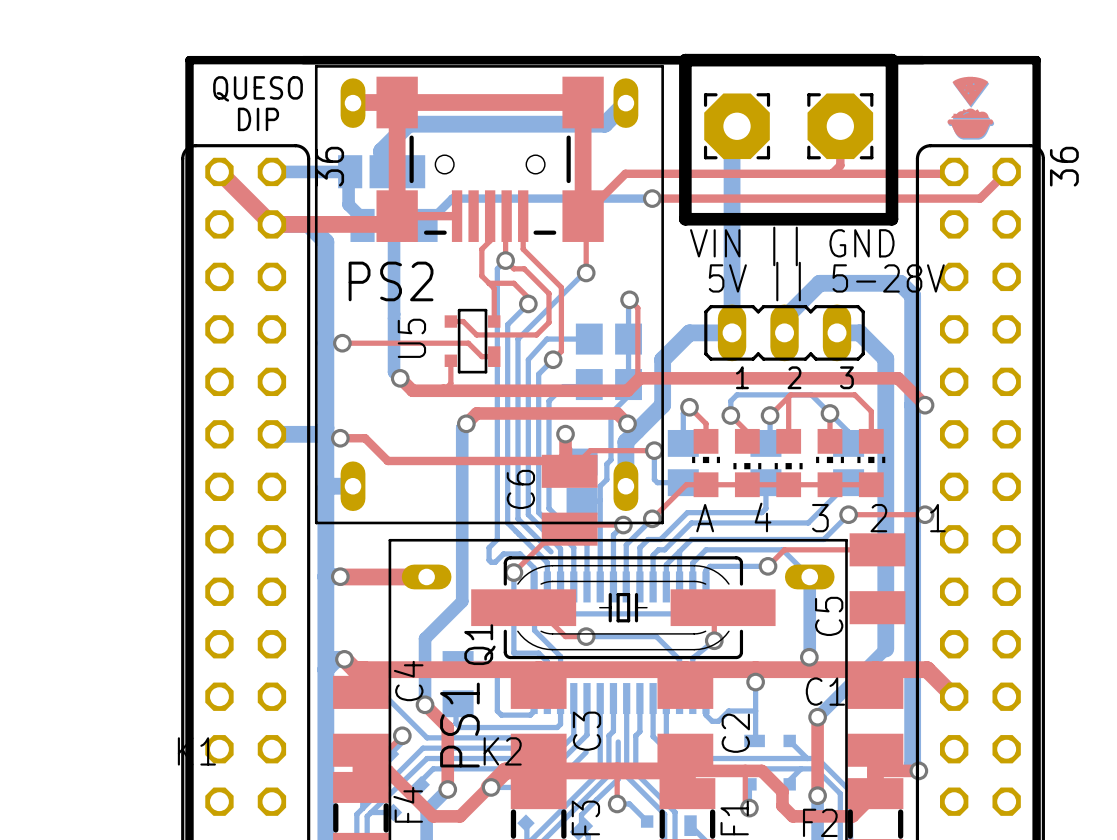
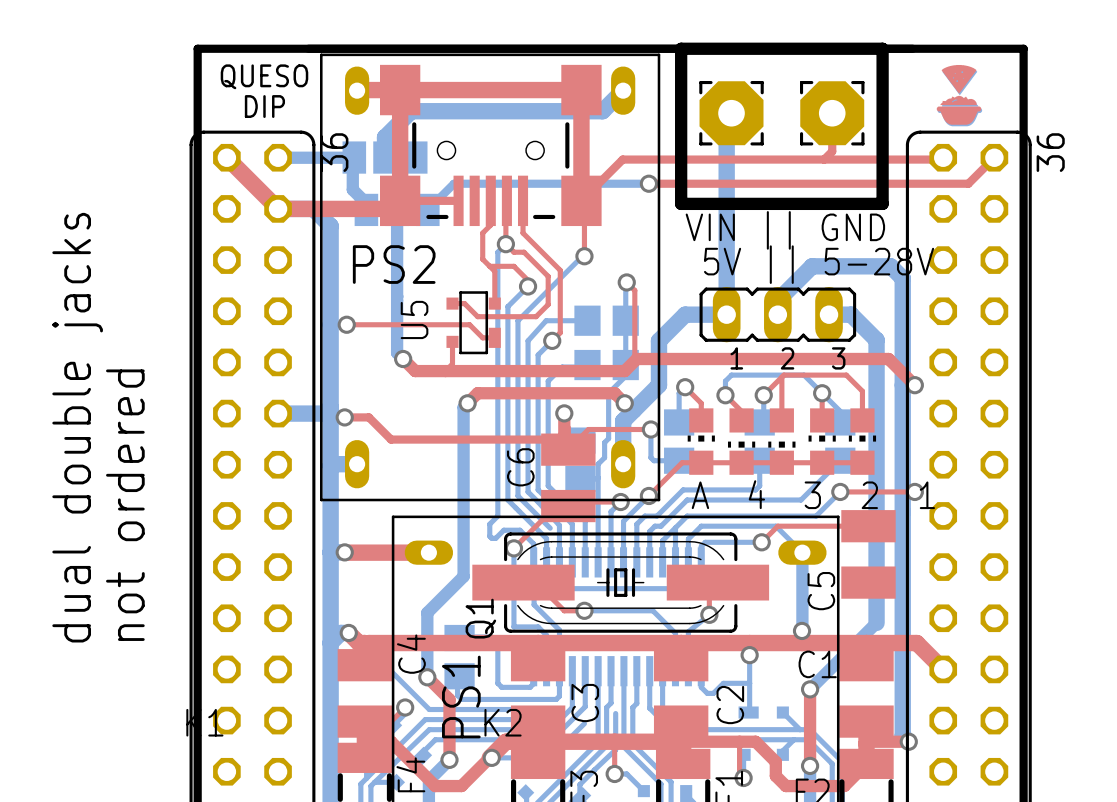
text: none -> dual double jacks (77, 427)
text: none -> not ordered (125, 505)

